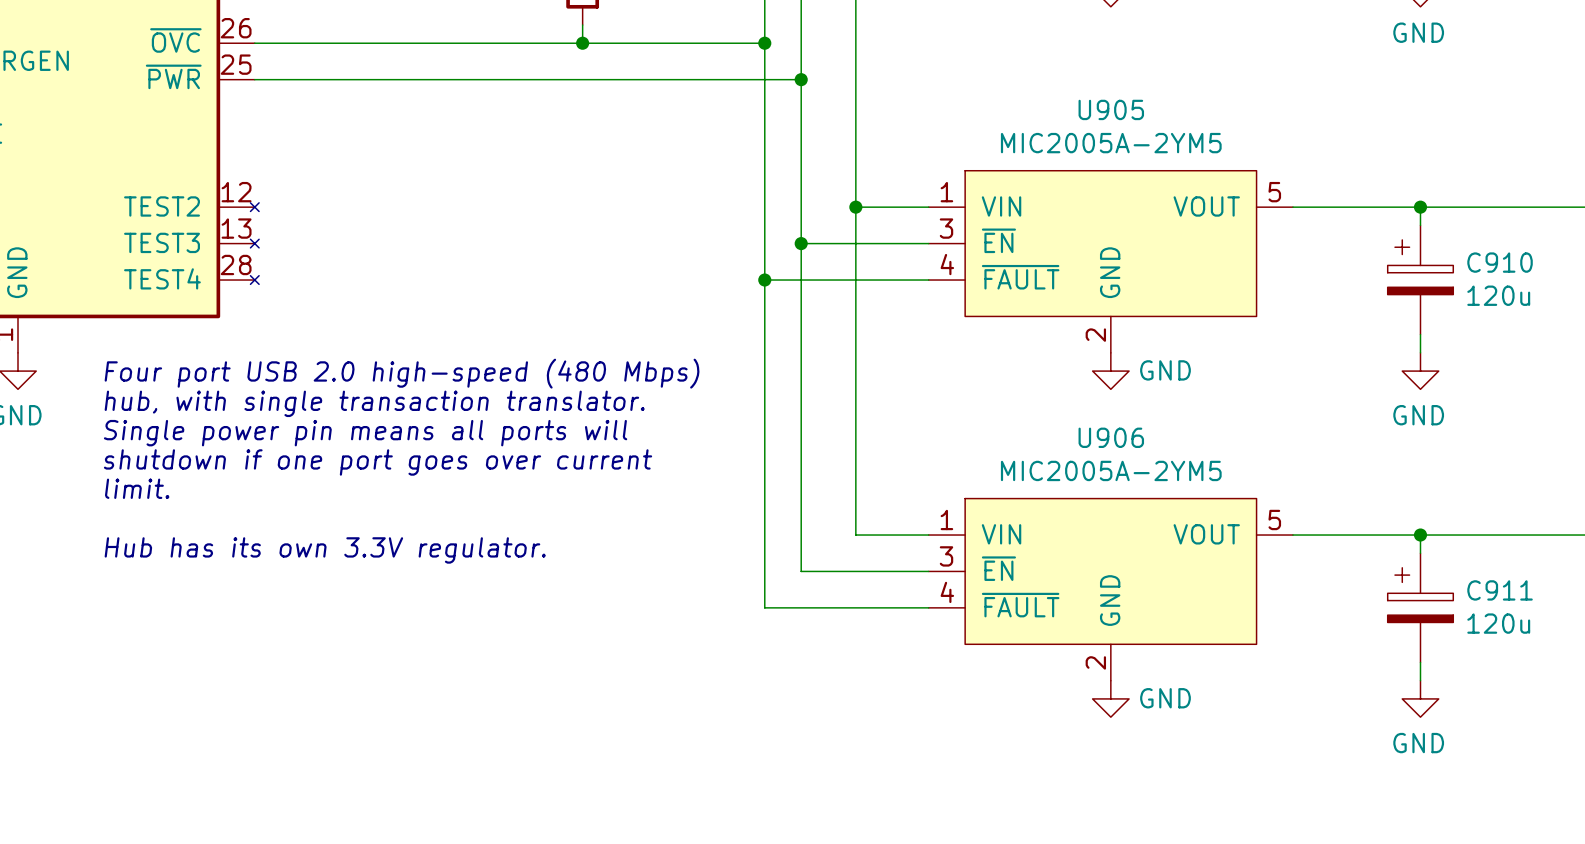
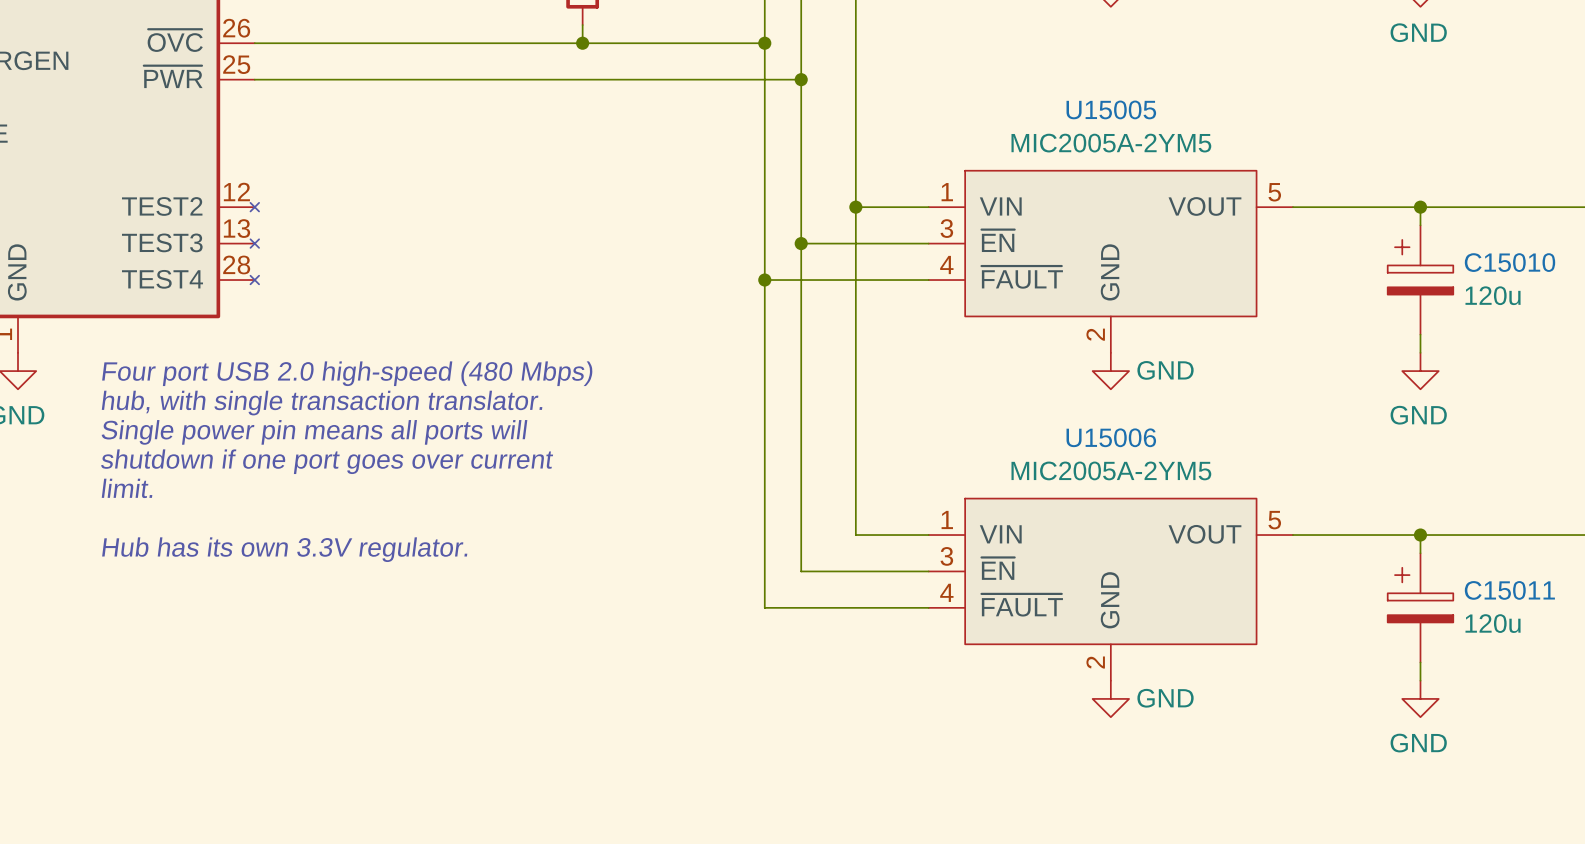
U905 name: U905 (1111, 109) -> U15005 (1111, 109)
C910 name: C910 (1500, 262) -> C15010 (1510, 262)
U906 name: U906 (1111, 437) -> U15006 (1111, 437)
C911 name: C911 (1500, 590) -> C15011 (1509, 590)

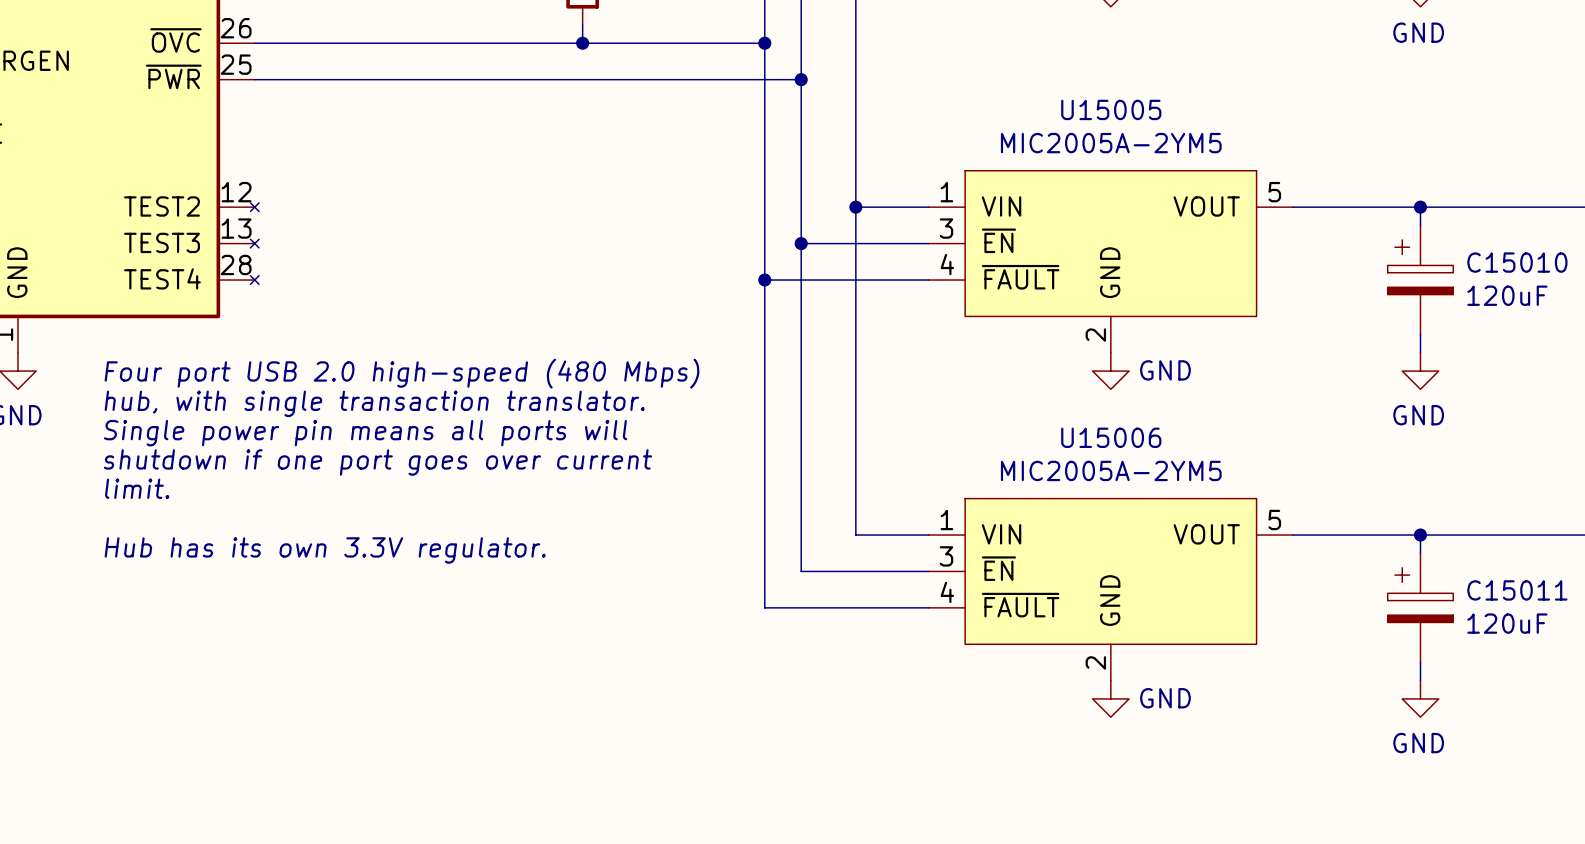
C15010 value: 120u (1493, 295) -> 120uF (1507, 295)
C15011 value: 120u (1493, 623) -> 120uF (1507, 623)

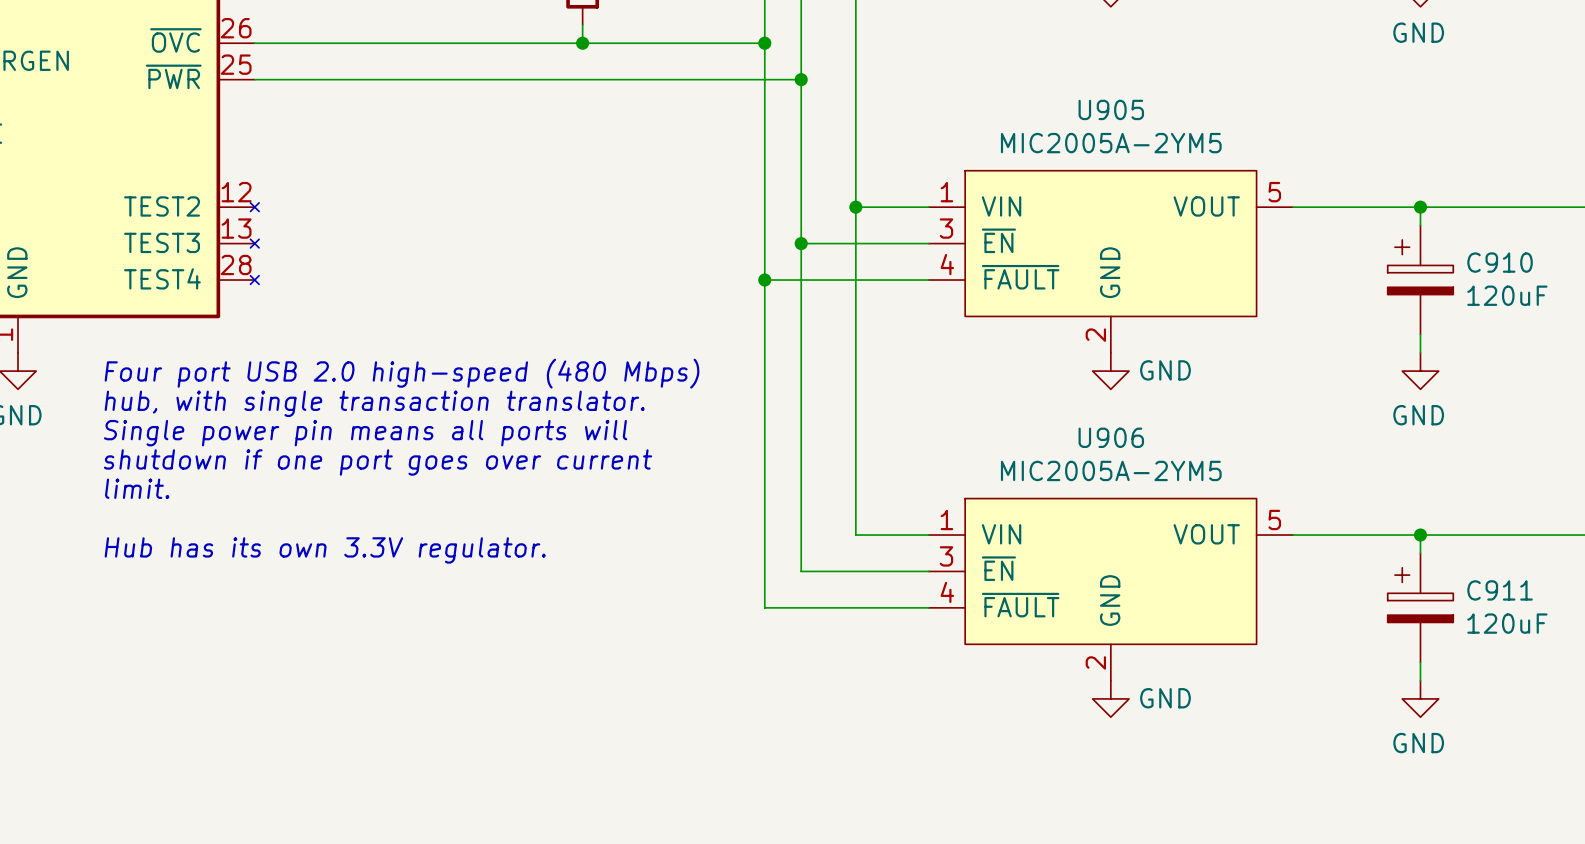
U15005 name: U15005 (1111, 109) -> U905 (1111, 109)
C15010 name: C15010 (1517, 262) -> C910 (1500, 262)
U15006 name: U15006 (1111, 437) -> U906 (1111, 437)
C15011 name: C15011 (1517, 590) -> C911 (1500, 590)

